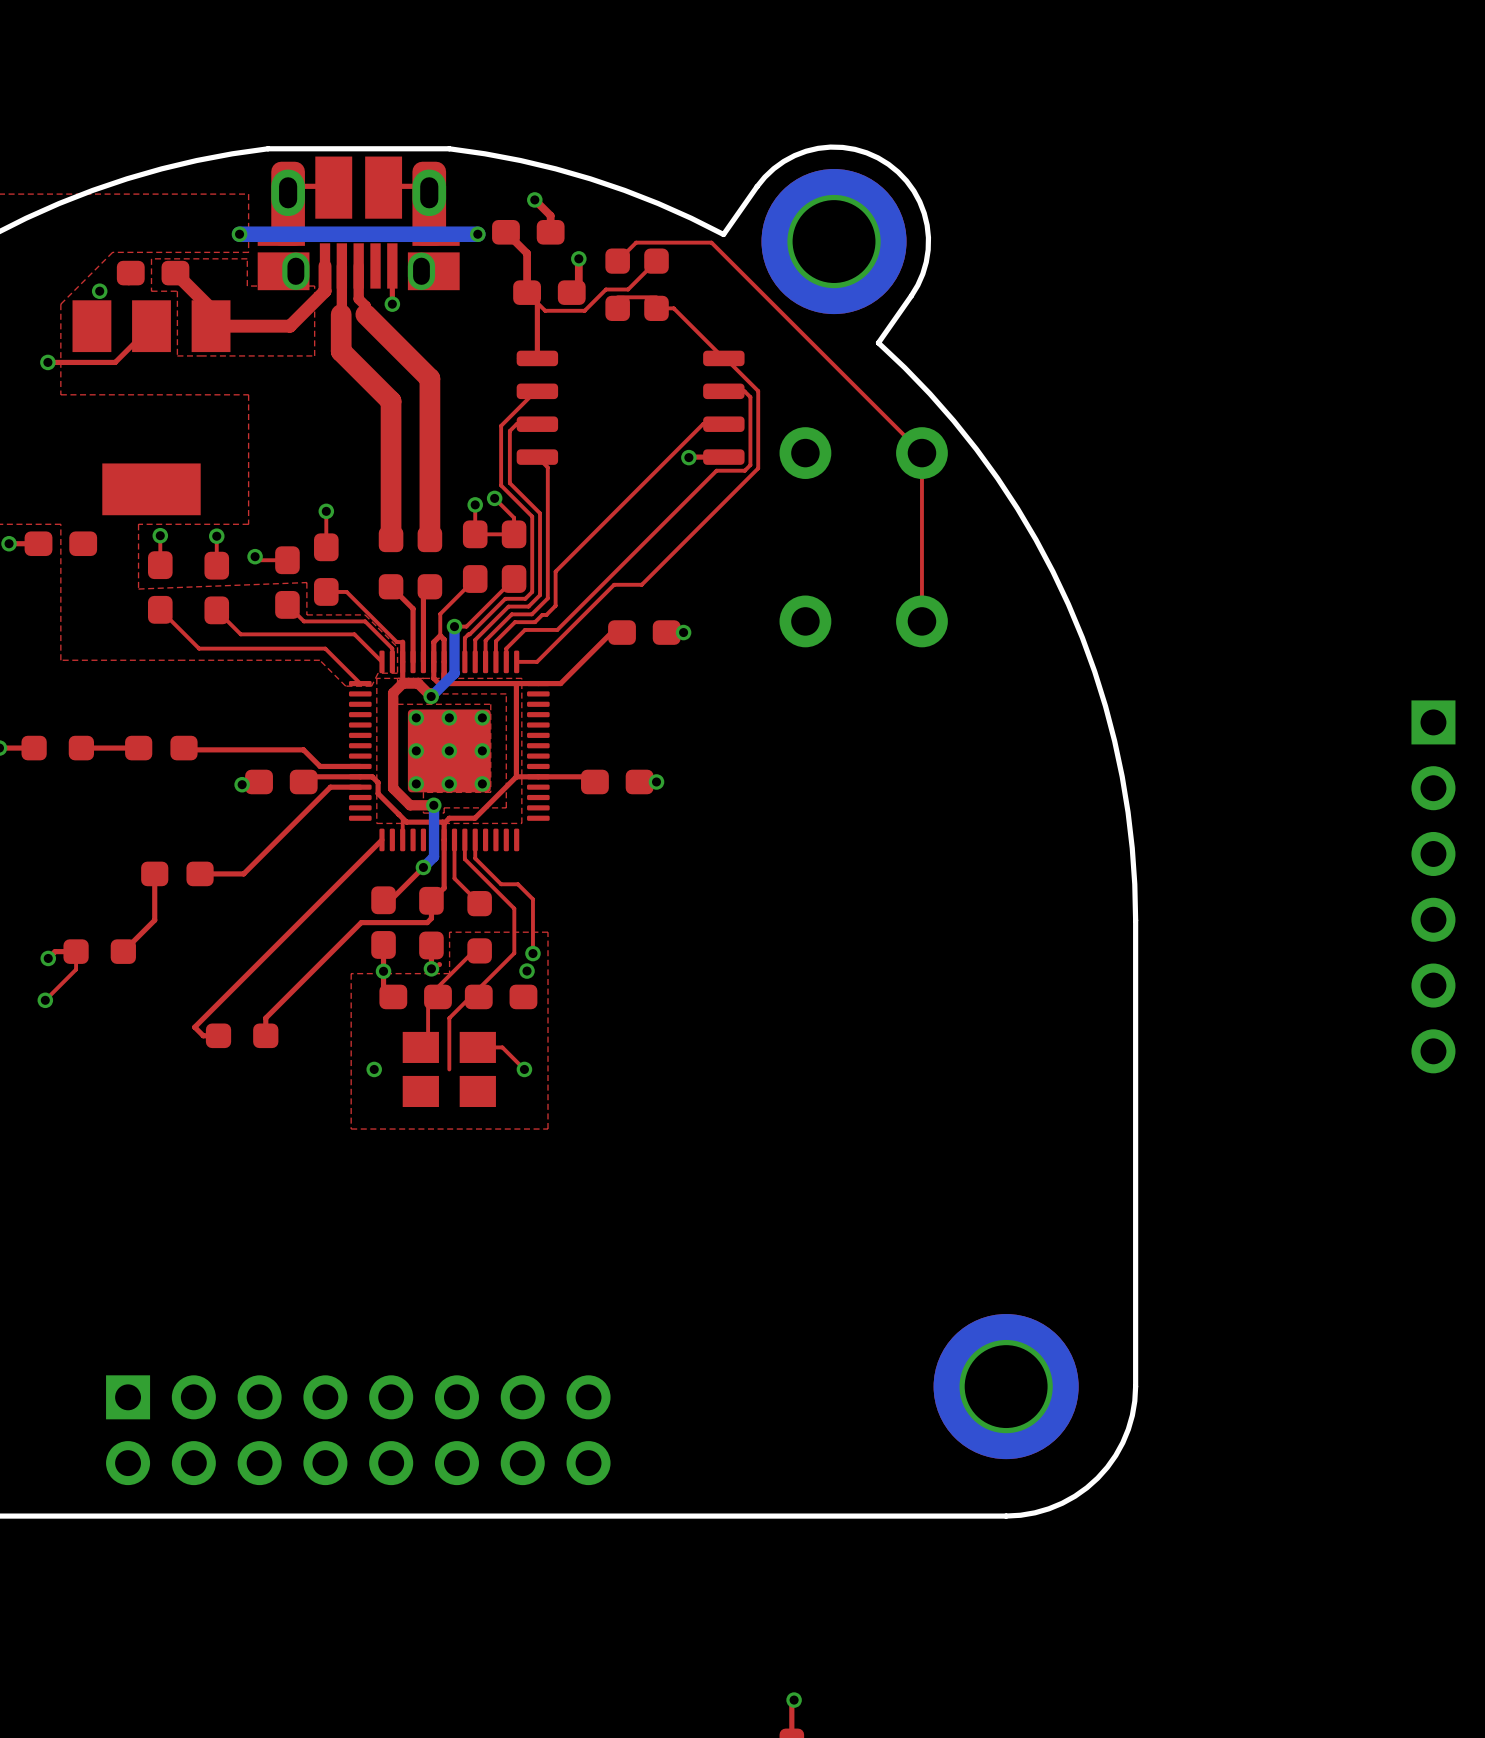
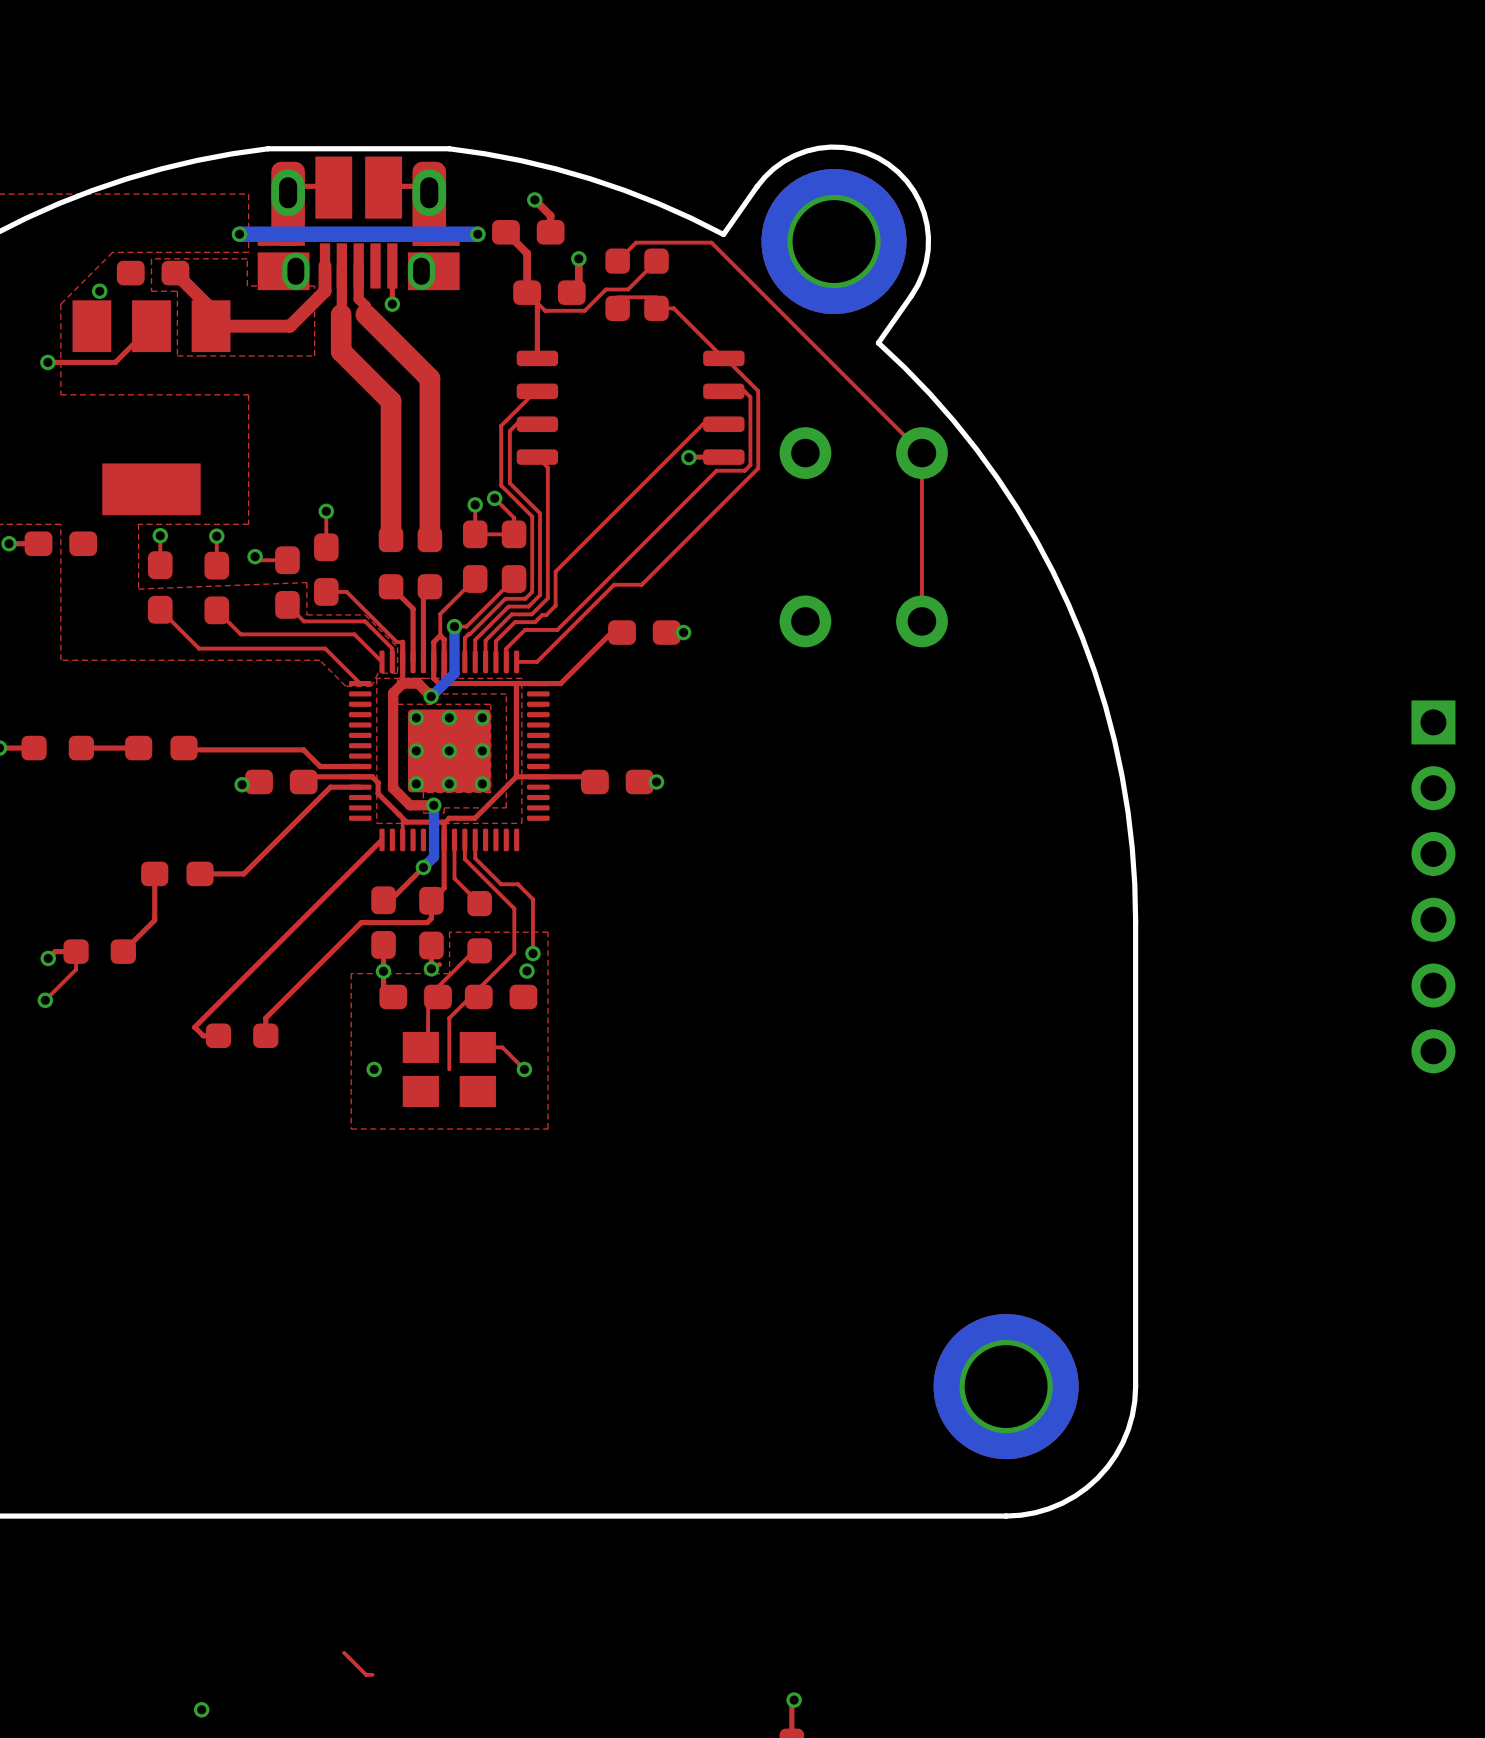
part: (358, 1430) -> none
top track: none -> (344, 1652) (366, 1674) (372, 1674)
via: none -> (201, 1709)

